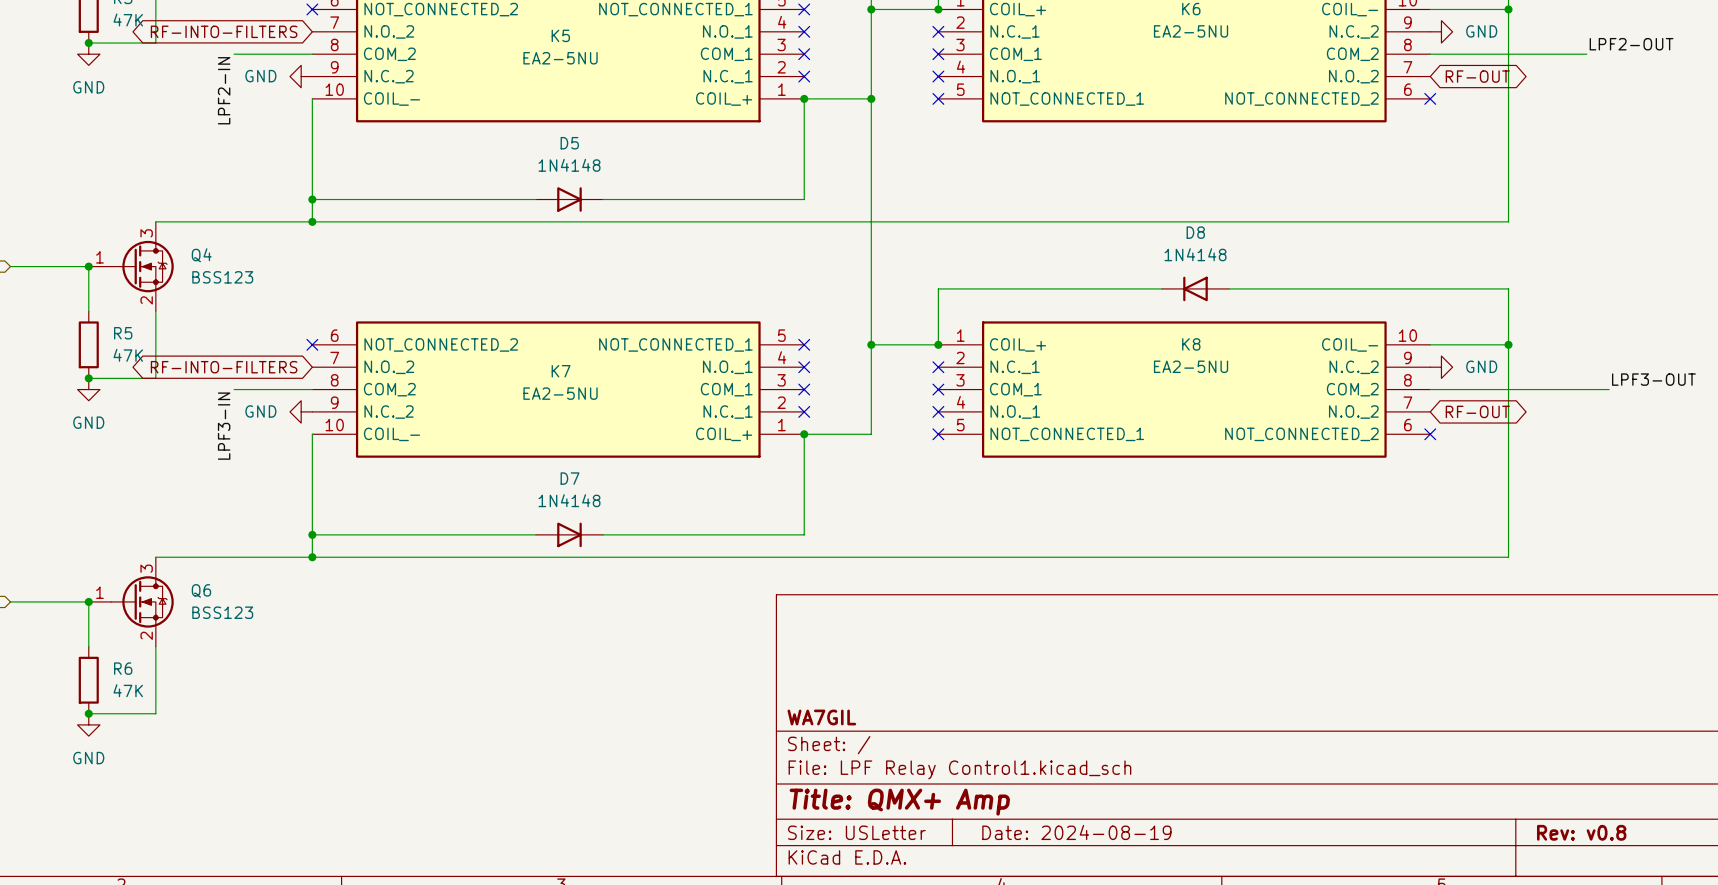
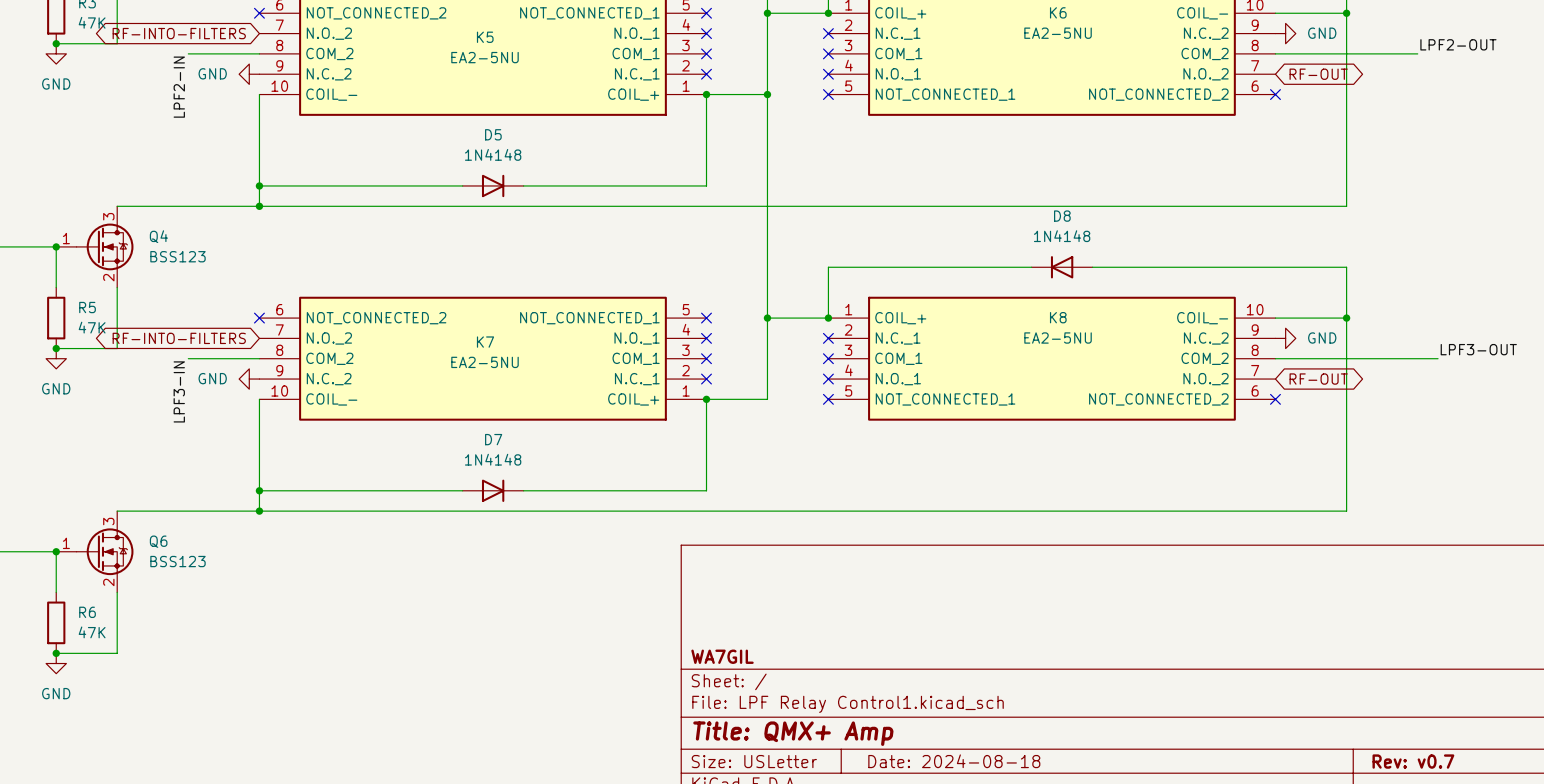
title block: Date: 2024-08-19 (1076, 832) -> Date: 2024-08-18 (954, 761)
title block: Rev: v0.8 (1581, 832) -> Rev: v0.7 (1413, 761)

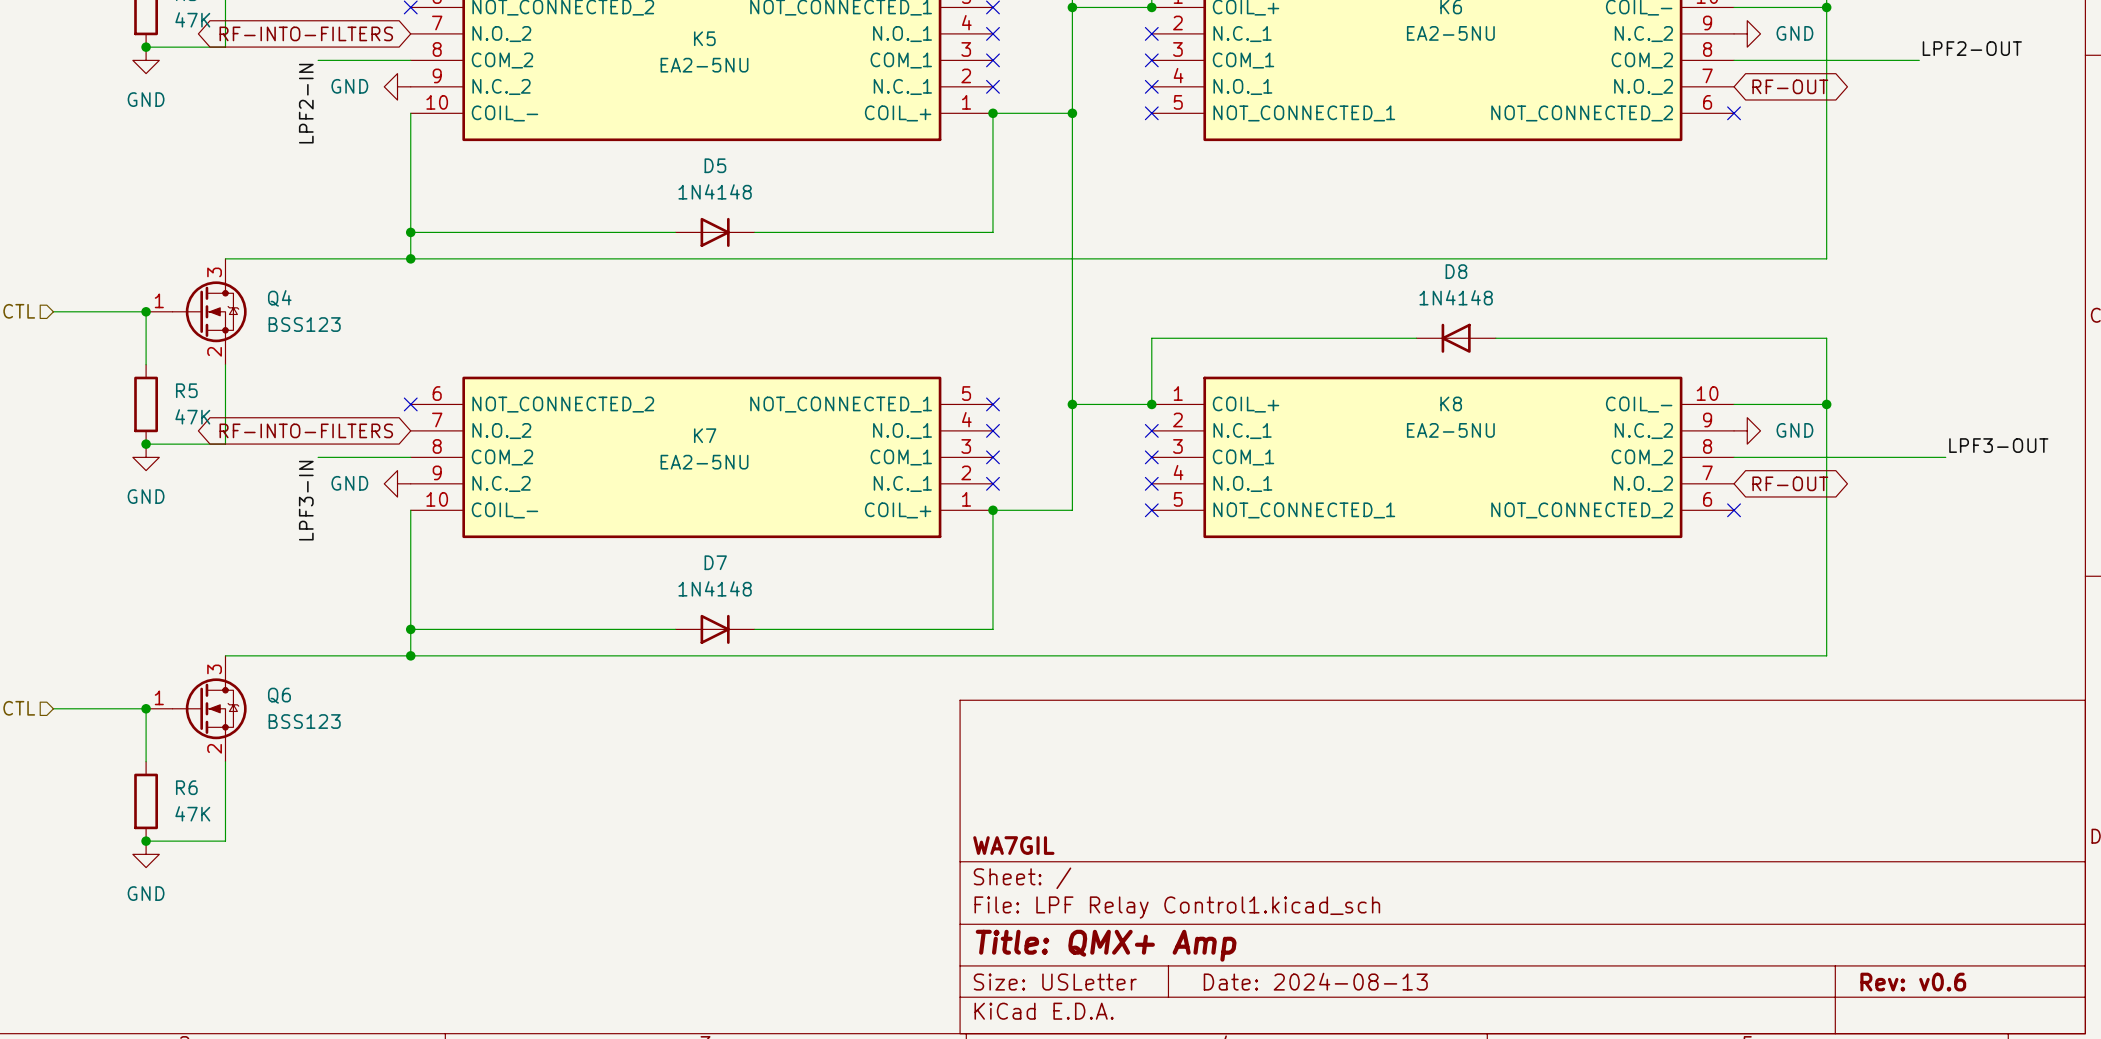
title block: Date: 2024-08-18 (954, 761) -> Date: 2024-08-13 (1315, 981)
title block: Rev: v0.7 (1413, 761) -> Rev: v0.6 (1913, 982)

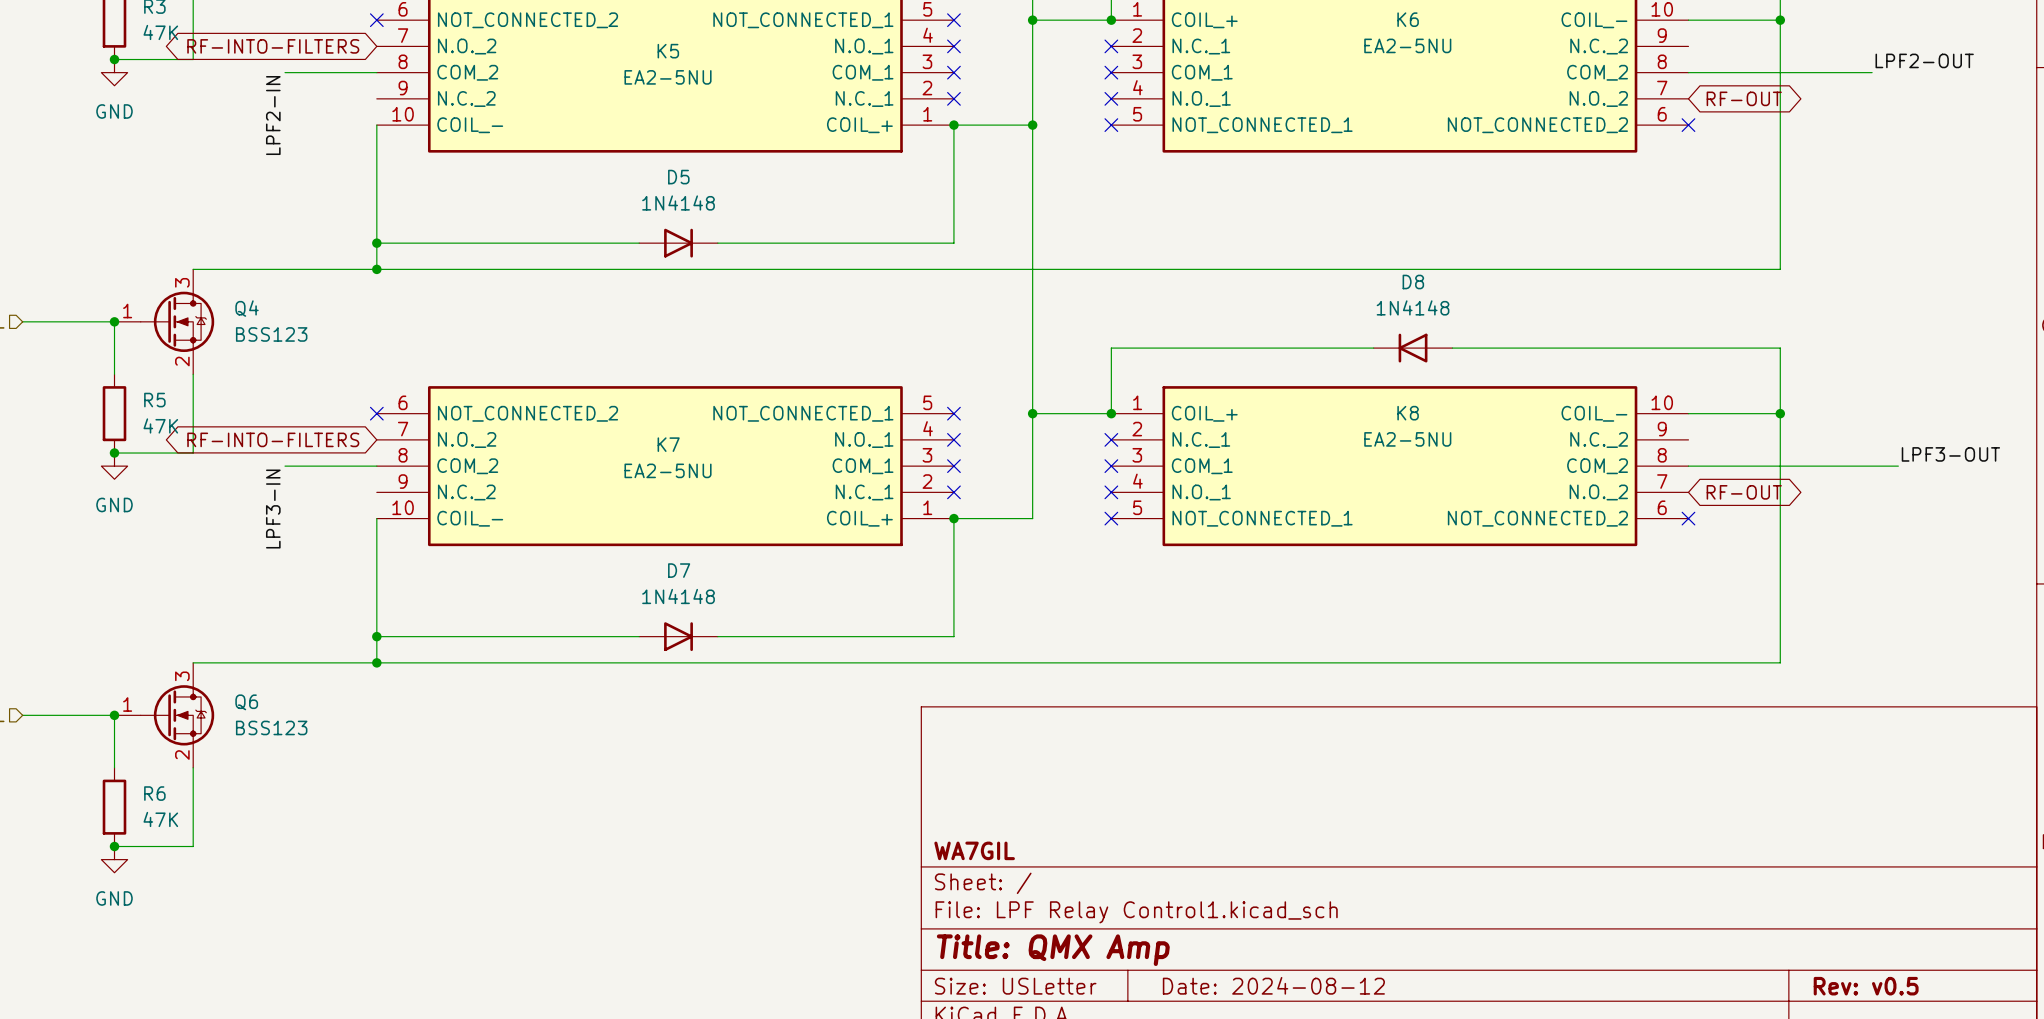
power symbol: GND (1747, 33) -> none
power symbol: GND (397, 86) -> none
power symbol: GND (1747, 430) -> none
power symbol: GND (397, 483) -> none
title block: Title: QMX+ Amp (1106, 945) -> Title: QMX Amp (1053, 950)
title block: Date: 2024-08-13 (1315, 981) -> Date: 2024-08-12 (1273, 985)
title block: Rev: v0.6 (1913, 982) -> Rev: v0.5 (1866, 986)

